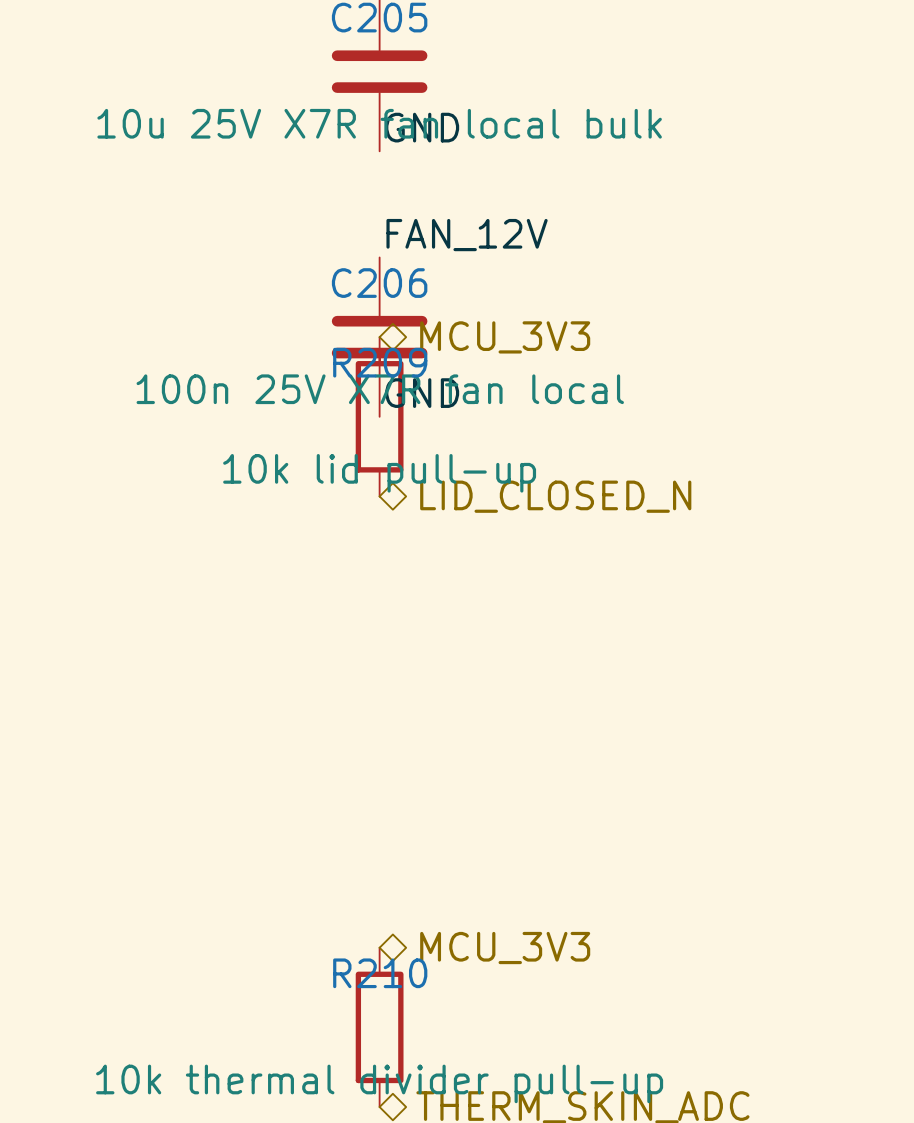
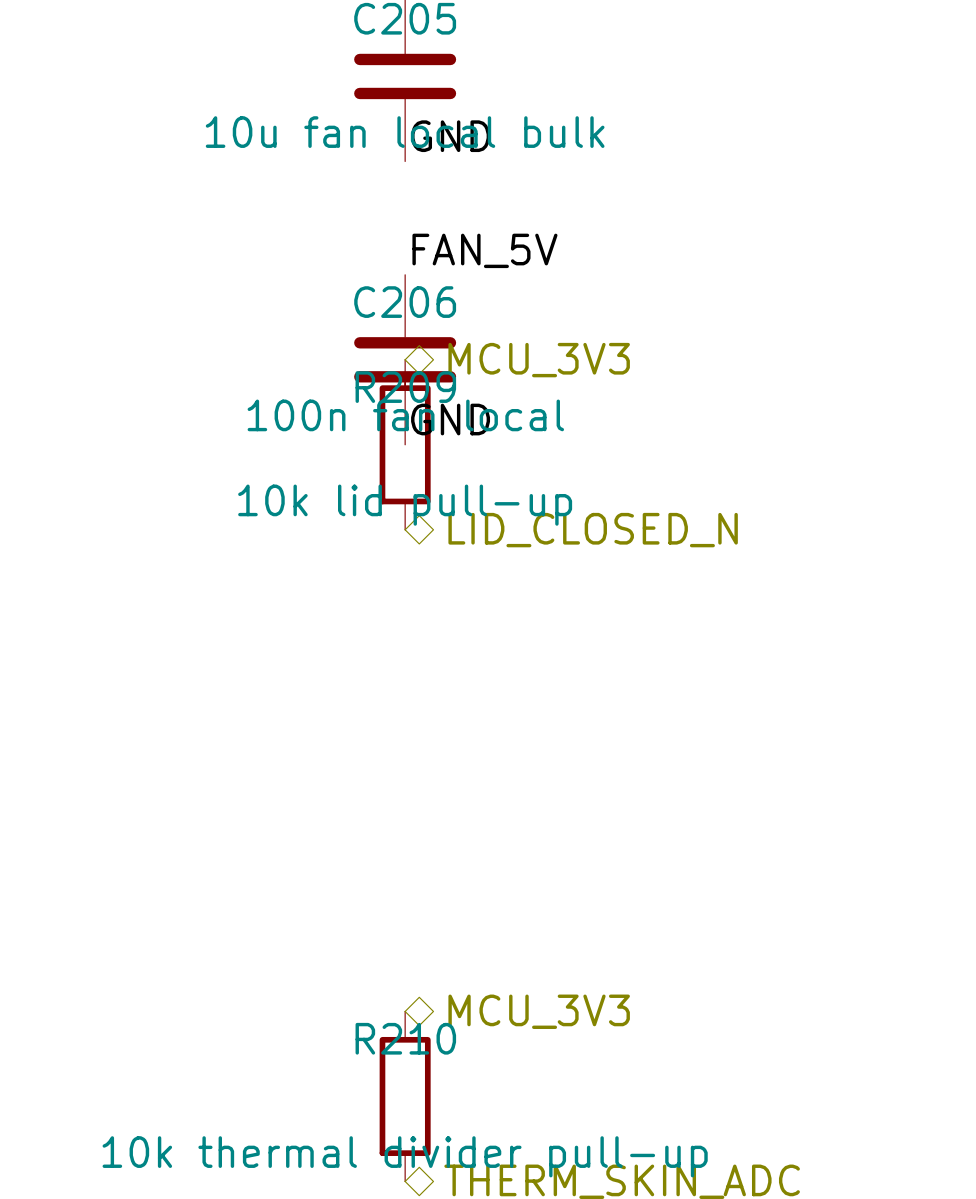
C205 value: 10u 25V X7R fan local bulk (379, 123) -> 10u fan local bulk (405, 132)
label: FAN_12V (467, 235) -> FAN_5V (484, 250)
C206 value: 100n 25V X7R fan local (380, 389) -> 100n fan local (405, 415)

